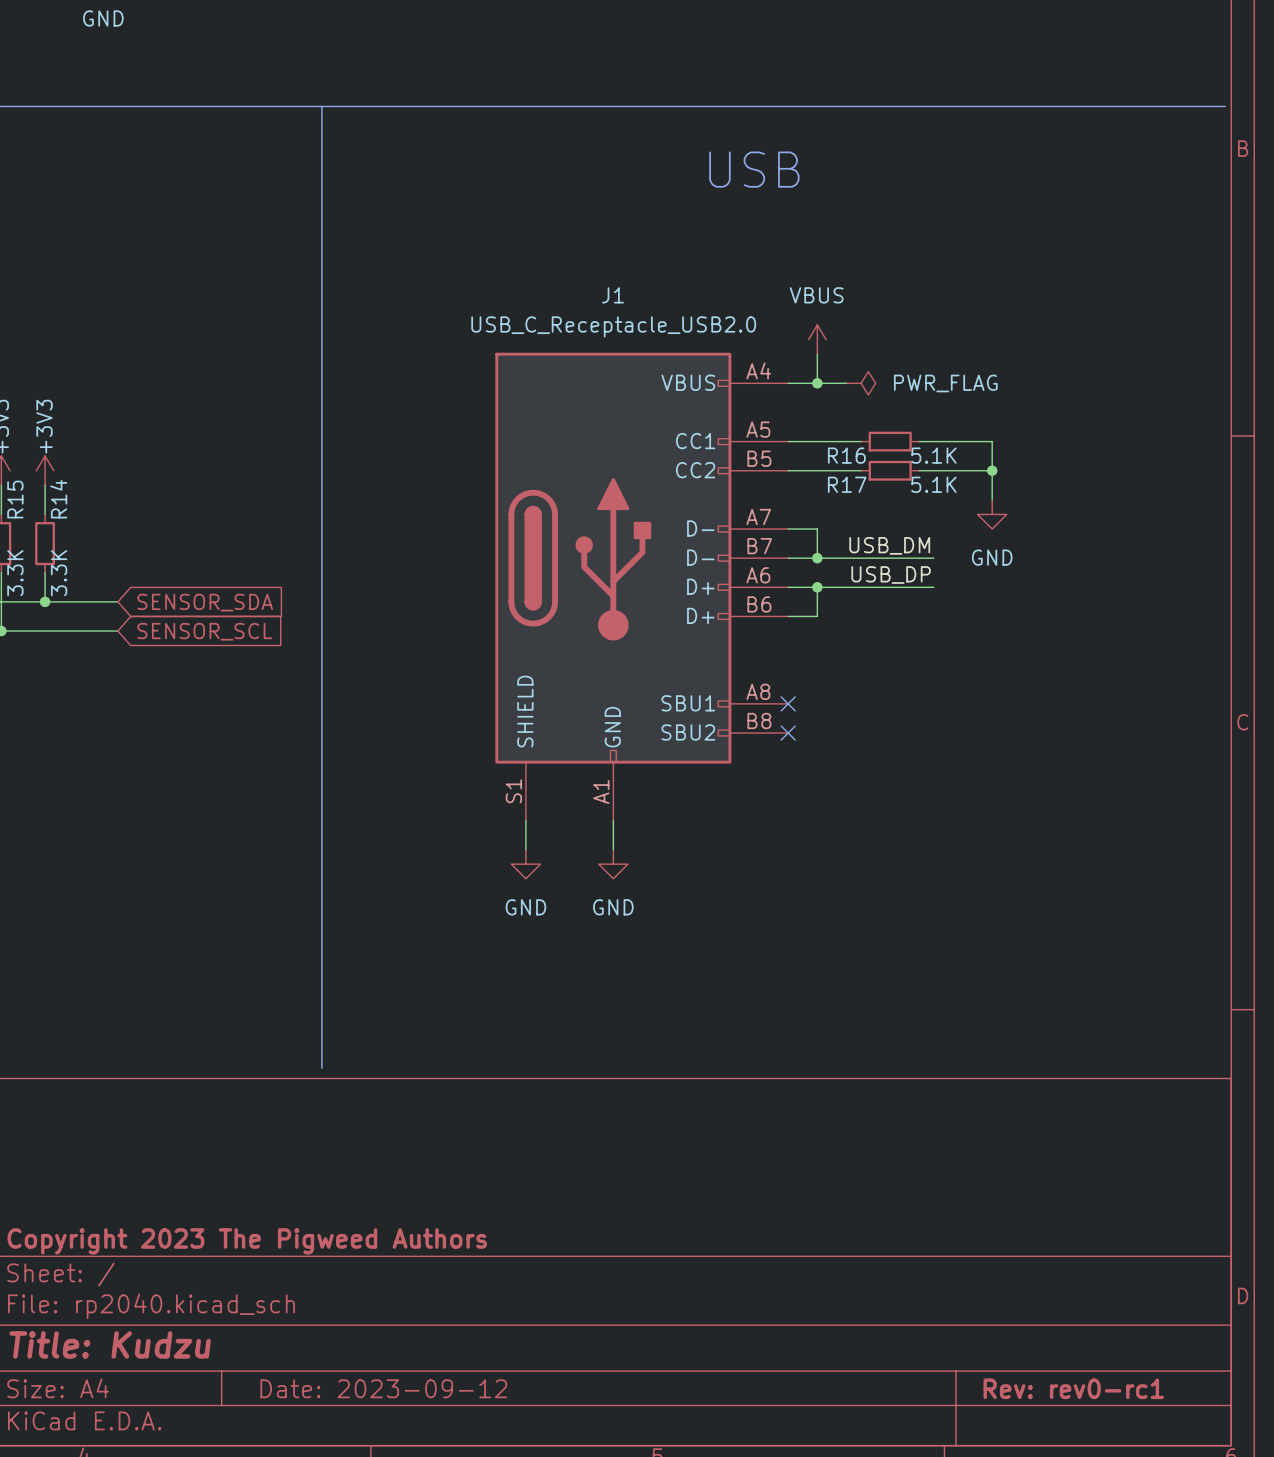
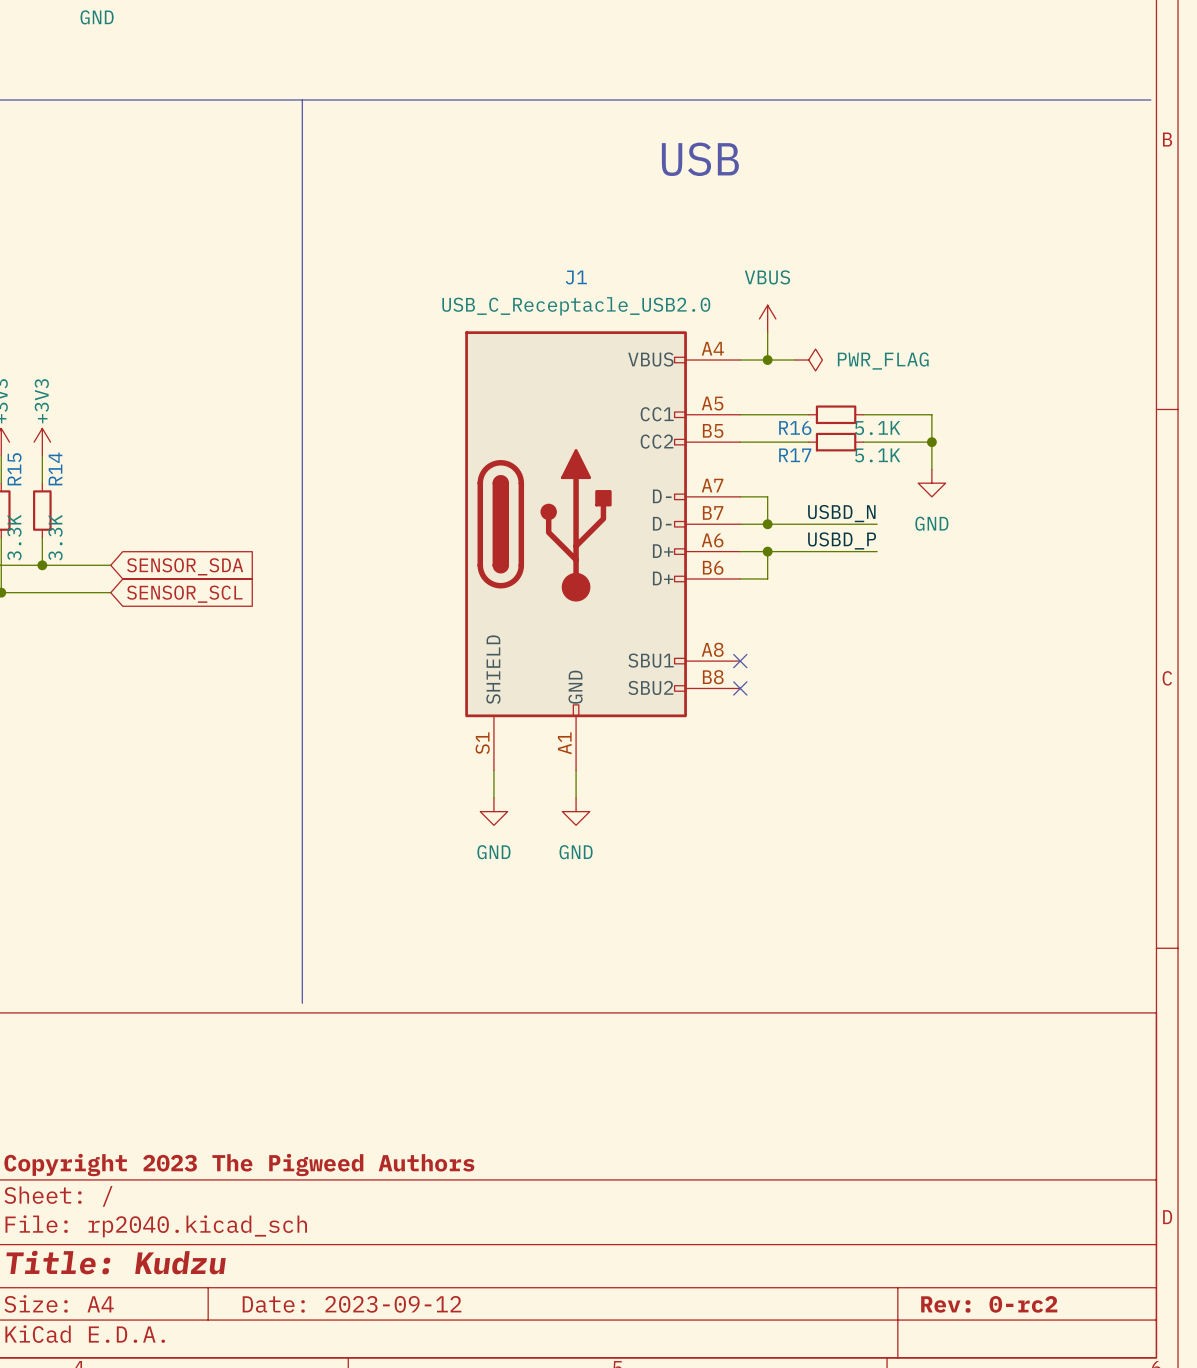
label: USB_DM (889, 545) -> USBD_N (841, 513)
label: USB_DP (891, 575) -> USBD_P (842, 540)
title block: Rev: rev0-rc1 (1073, 1388) -> Rev: 0-rc2 (989, 1304)

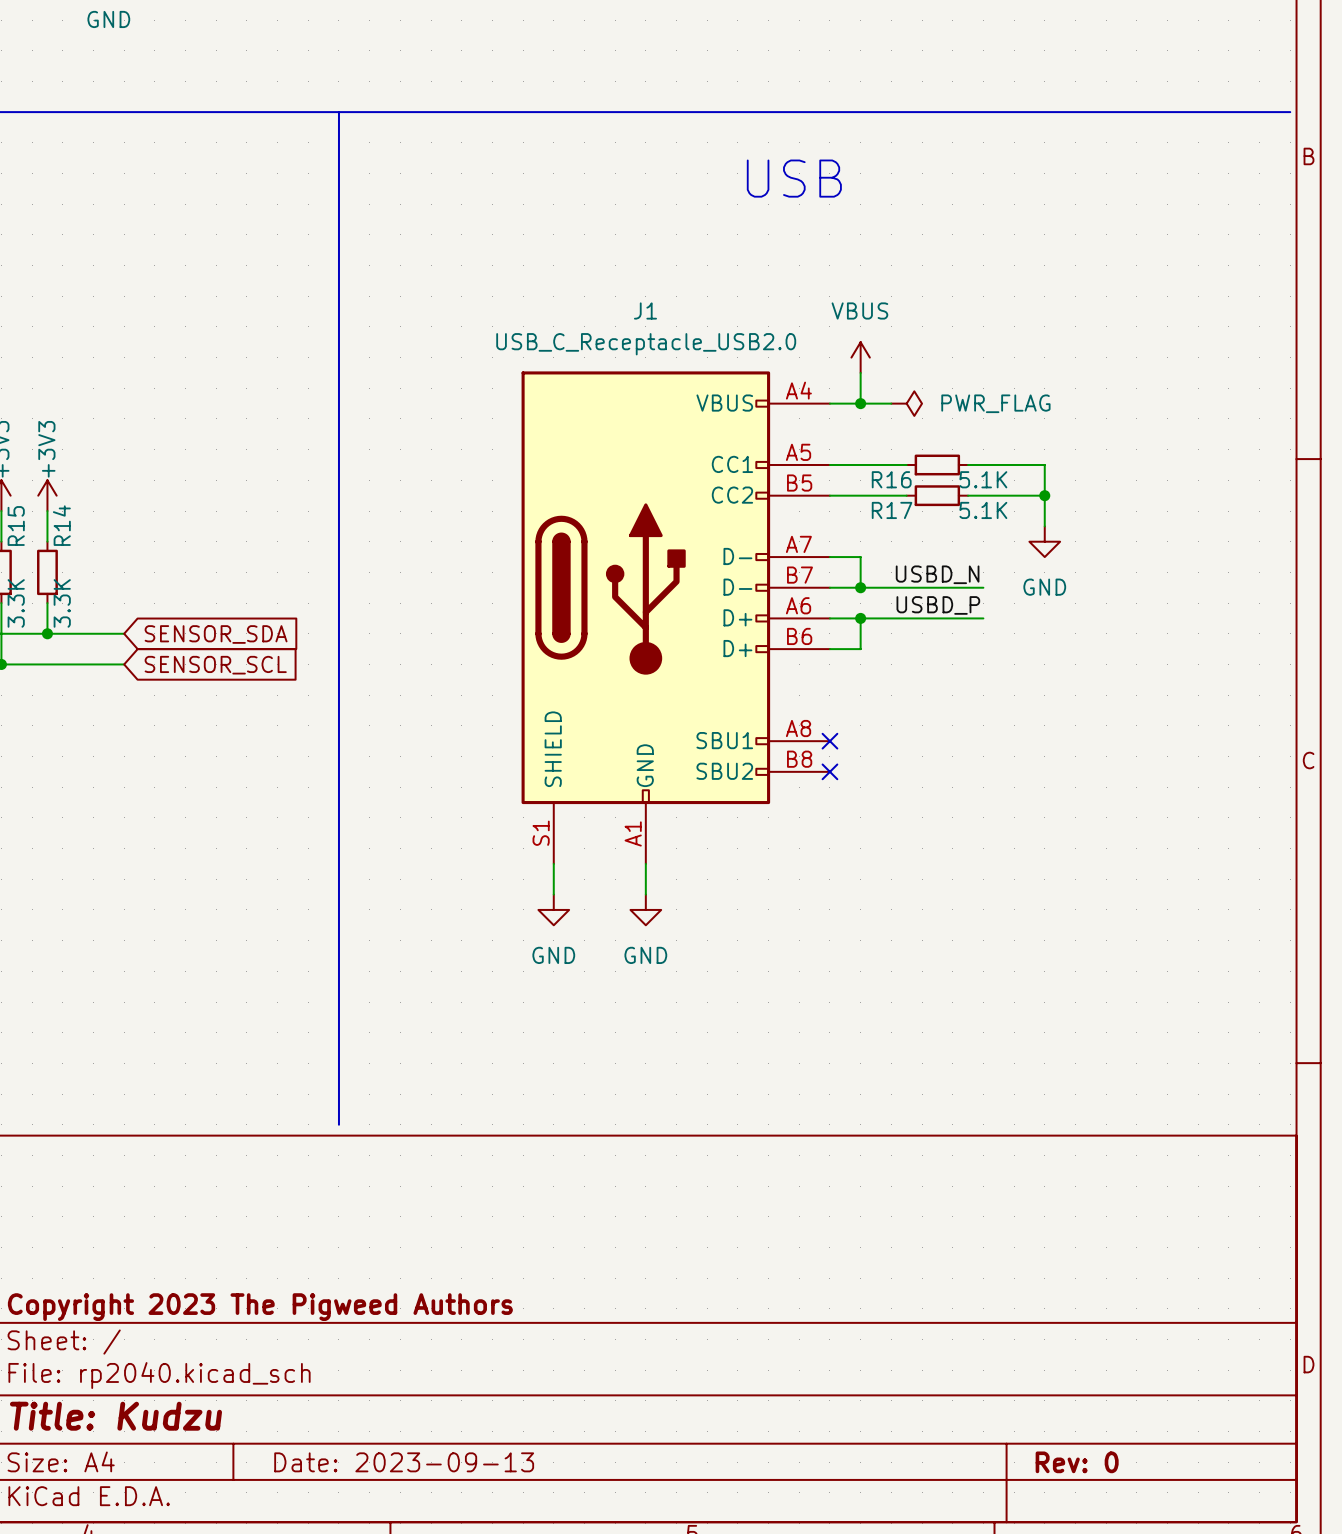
title block: Date: 2023-09-12 (352, 1304) -> Date: 2023-09-13 (404, 1462)
title block: Rev: 0-rc2 (989, 1304) -> Rev: 0 (1077, 1462)

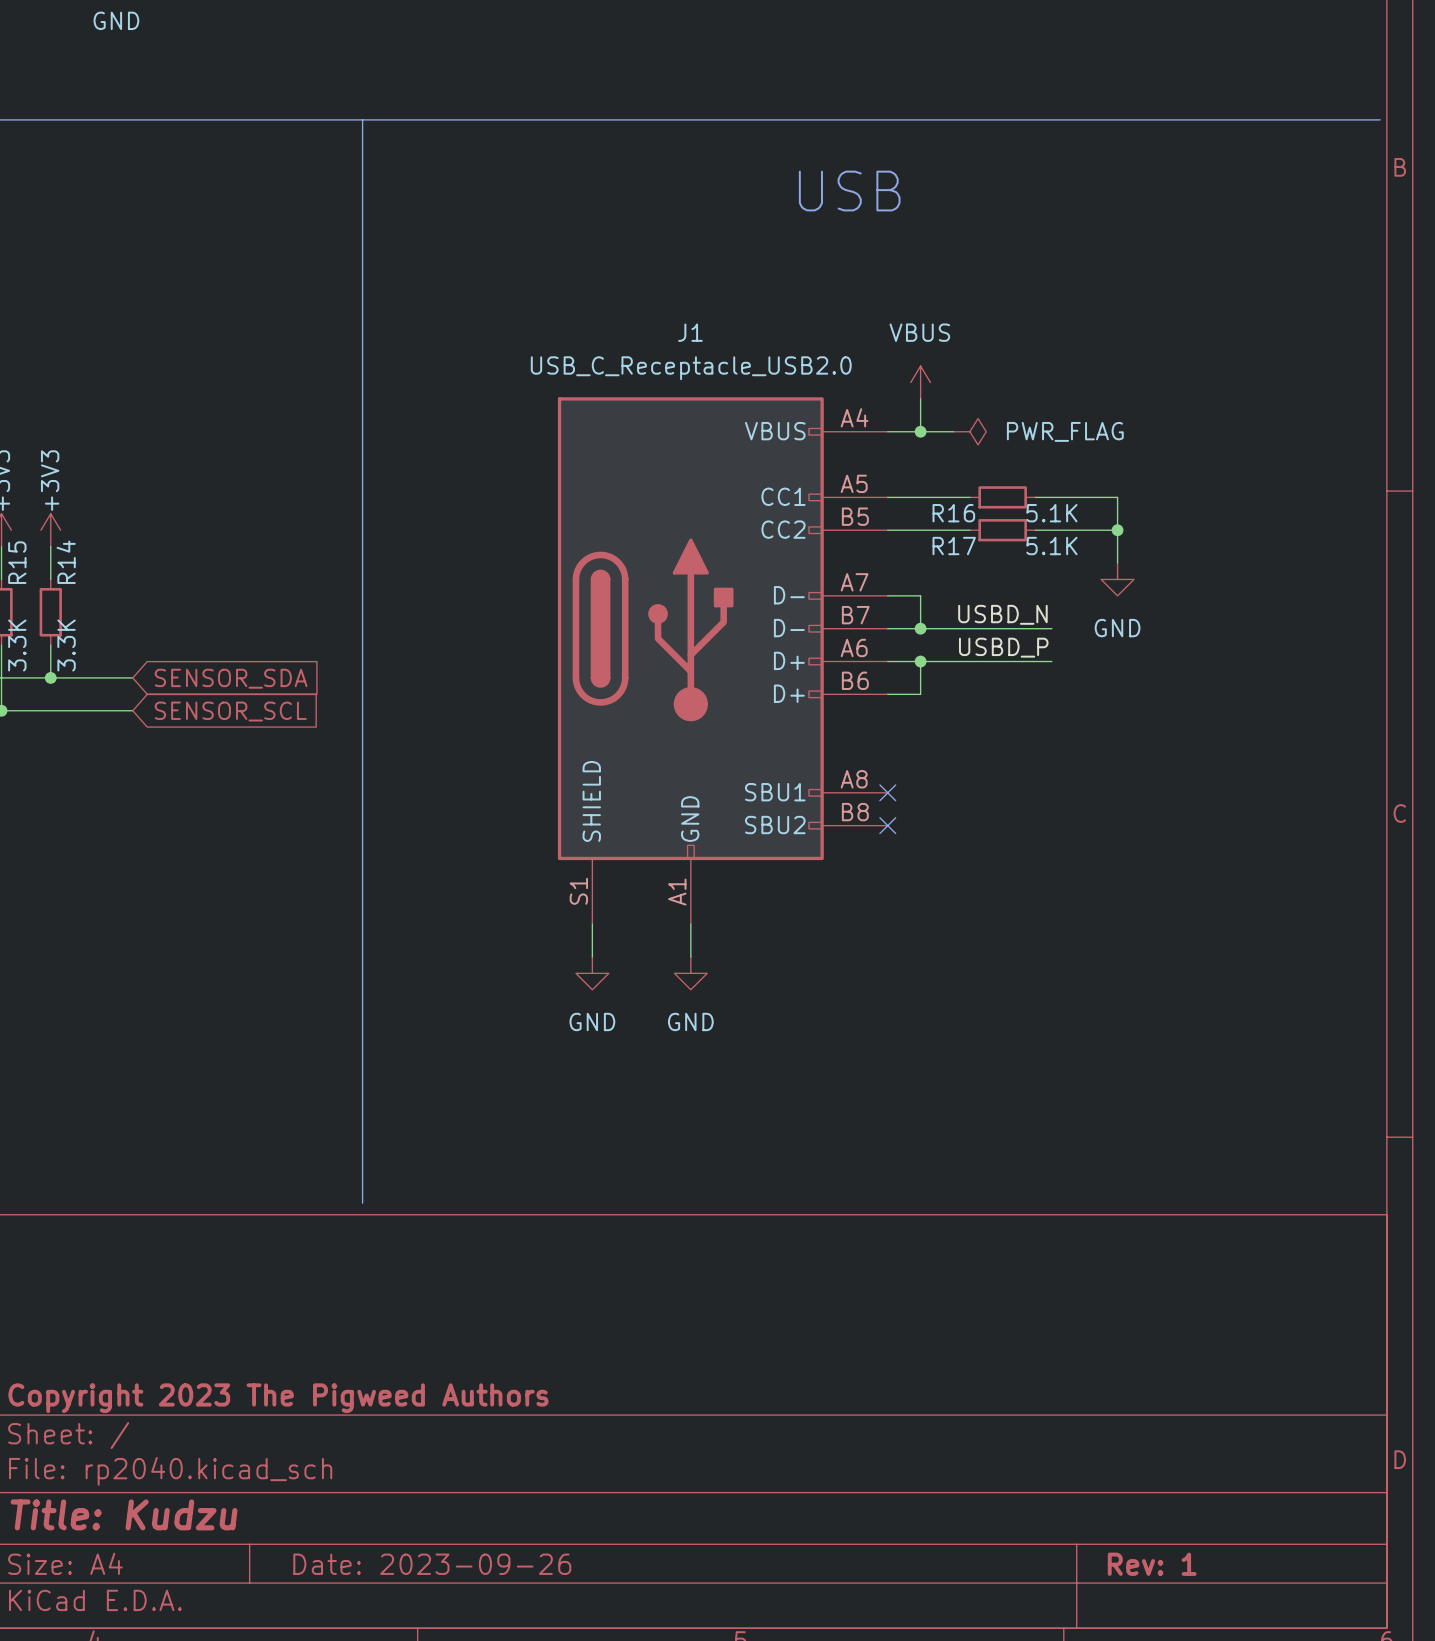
title block: Date: 2023-09-13 (404, 1462) -> Date: 2023-09-26 (432, 1564)
title block: Rev: 0 (1077, 1462) -> Rev: 1 (1152, 1564)

